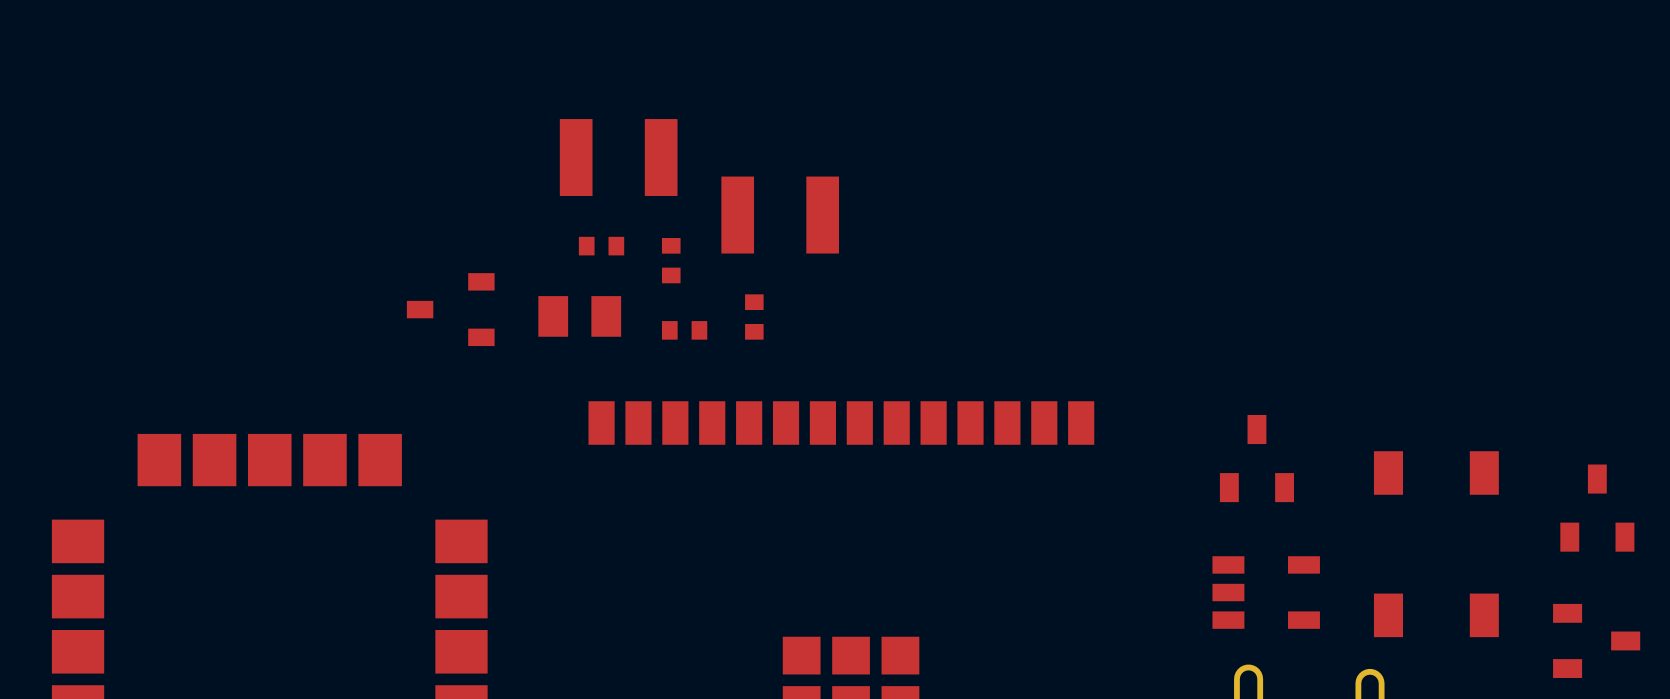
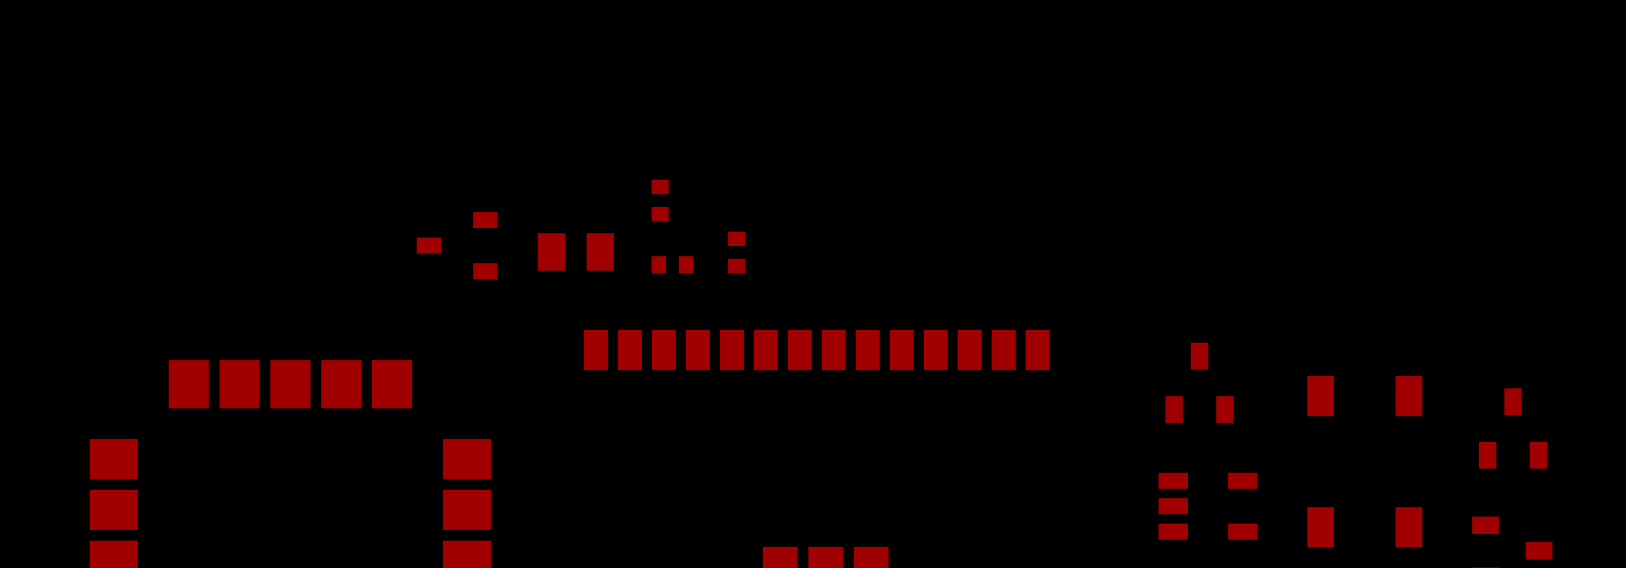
part: (618, 157) -> none
part: (780, 215) -> none
part: (601, 246) -> none

